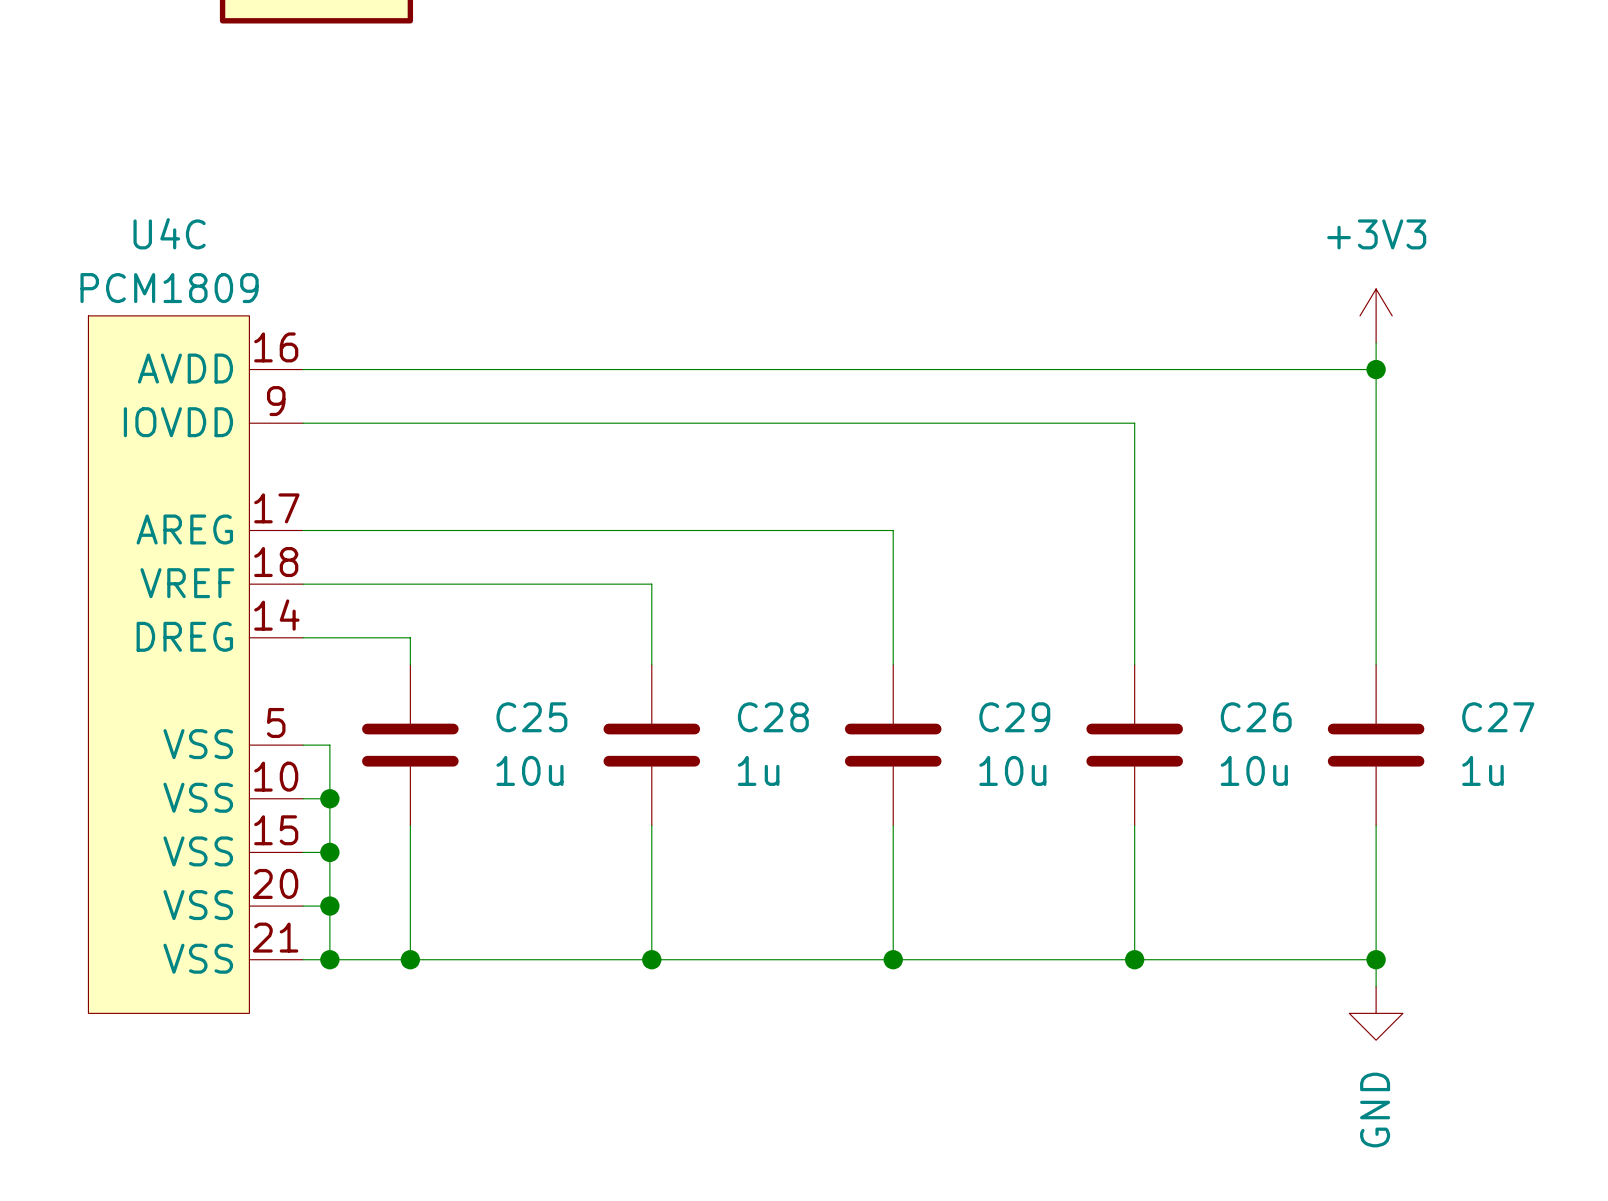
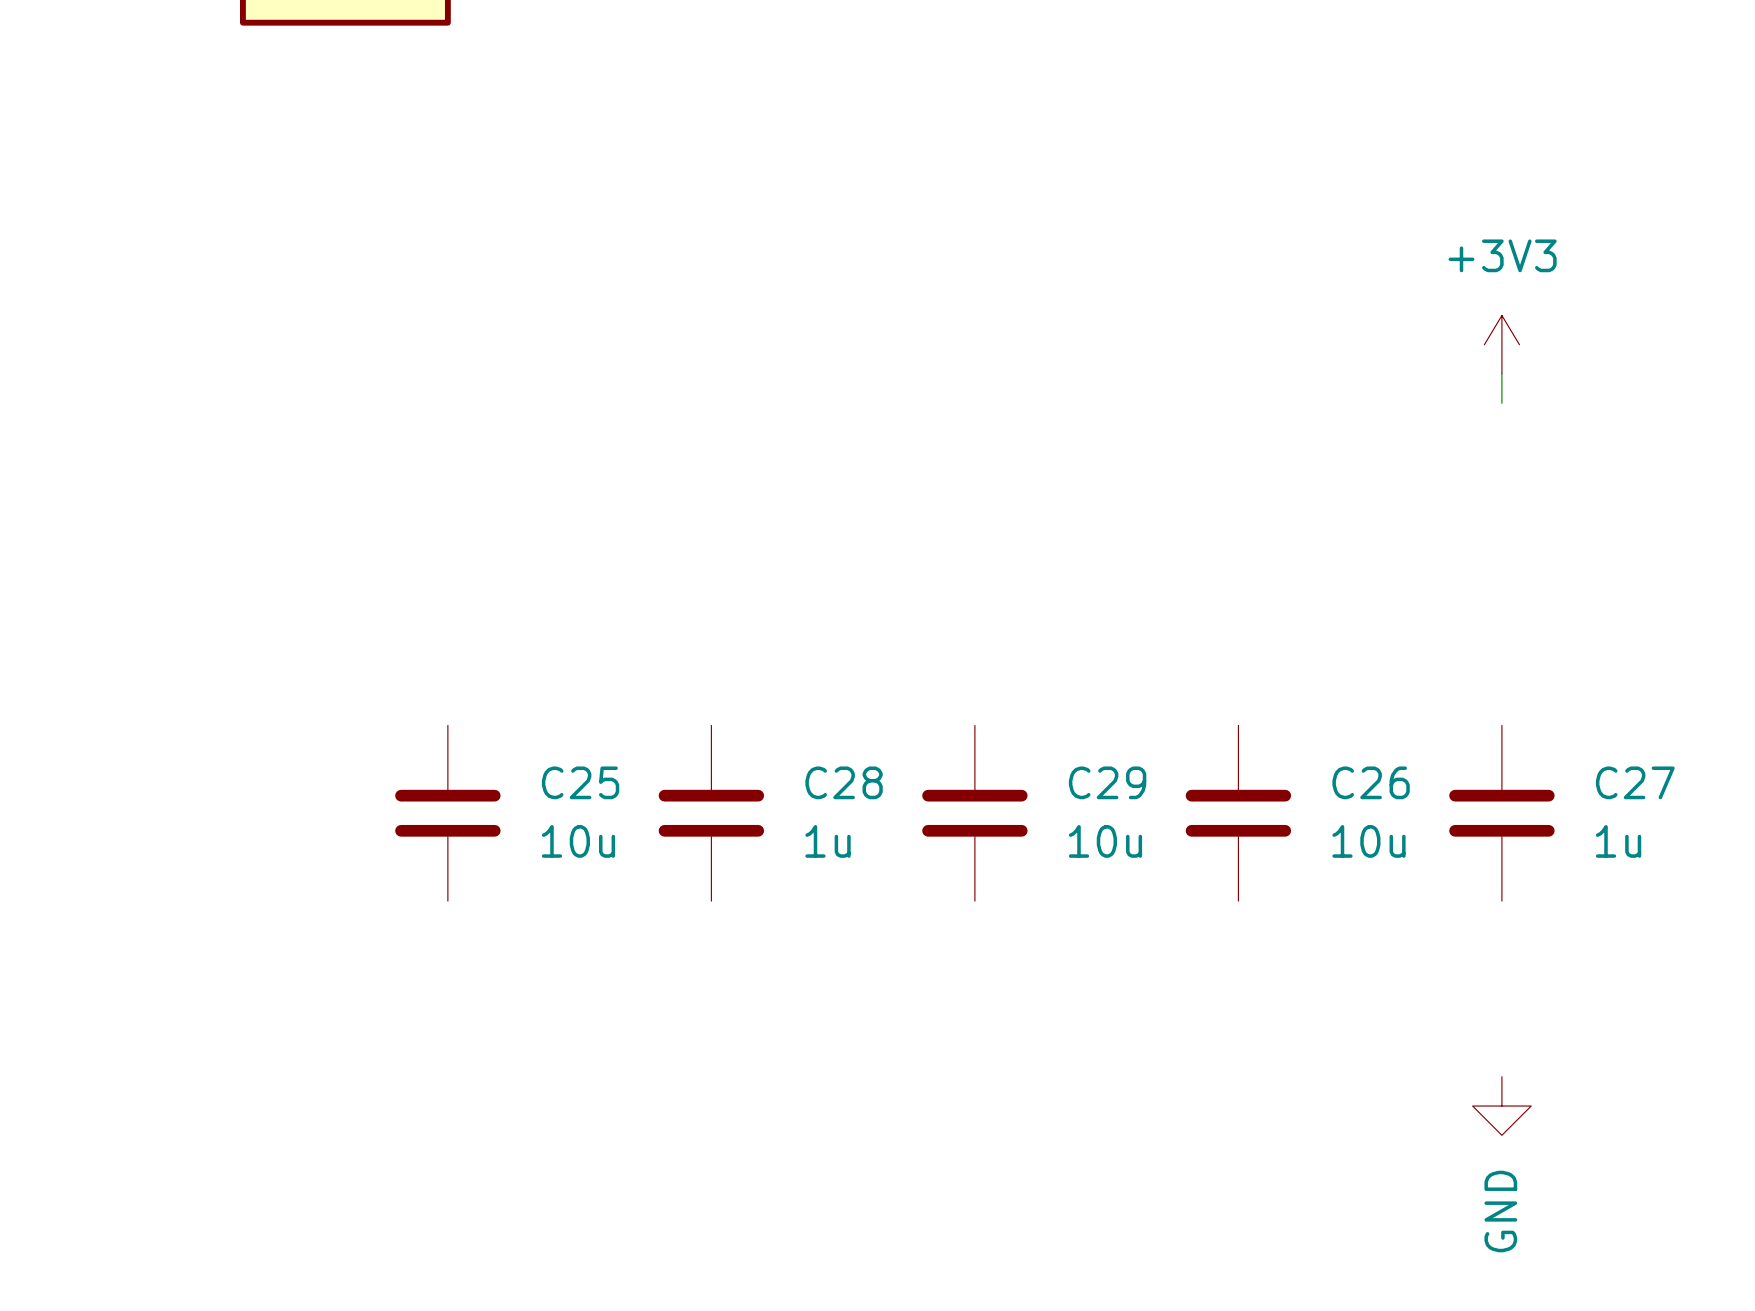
wire: (303, 369) (1376, 369) (1376, 664) -> none
junction: (1376, 369) -> none
wire: (303, 423) (1134, 423) (1134, 664) -> none
wire: (303, 530) (893, 530) (893, 664) -> none
wire: (303, 584) (651, 584) (651, 664) -> none
wire: (303, 637) (410, 637) (410, 664) -> none
U4C: PCM1809 (195, 664) -> none
wire: (303, 745) (329, 745) (329, 959) -> none
wire: (303, 798) (329, 798) -> none
junction: (329, 798) -> none
wire: (410, 825) (410, 959) -> none
wire: (651, 825) (651, 959) -> none
wire: (893, 825) (893, 959) -> none
wire: (1134, 825) (1134, 959) -> none
wire: (1376, 825) (1376, 986) -> none
wire: (303, 852) (329, 852) -> none
junction: (329, 852) -> none
wire: (303, 906) (329, 906) -> none
junction: (329, 906) -> none
wire: (303, 959) (1376, 959) -> none
junction: (329, 959) -> none
junction: (410, 959) -> none
junction: (651, 959) -> none
junction: (893, 959) -> none
junction: (1134, 959) -> none
junction: (1376, 959) -> none

